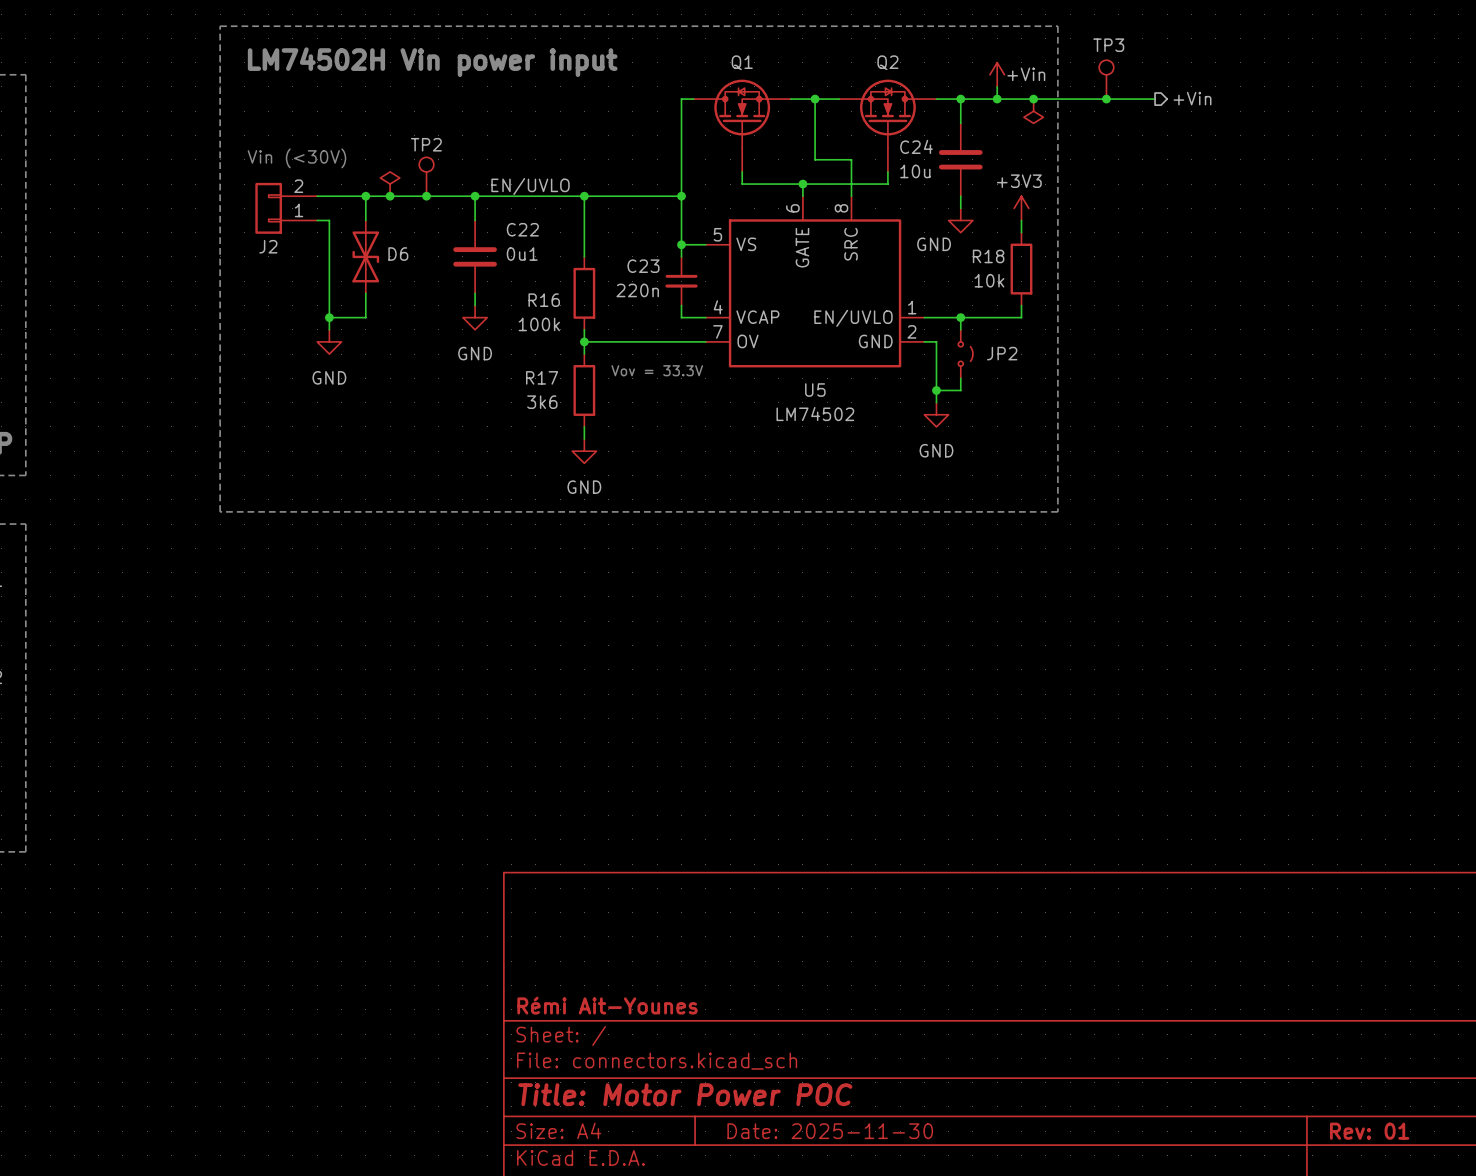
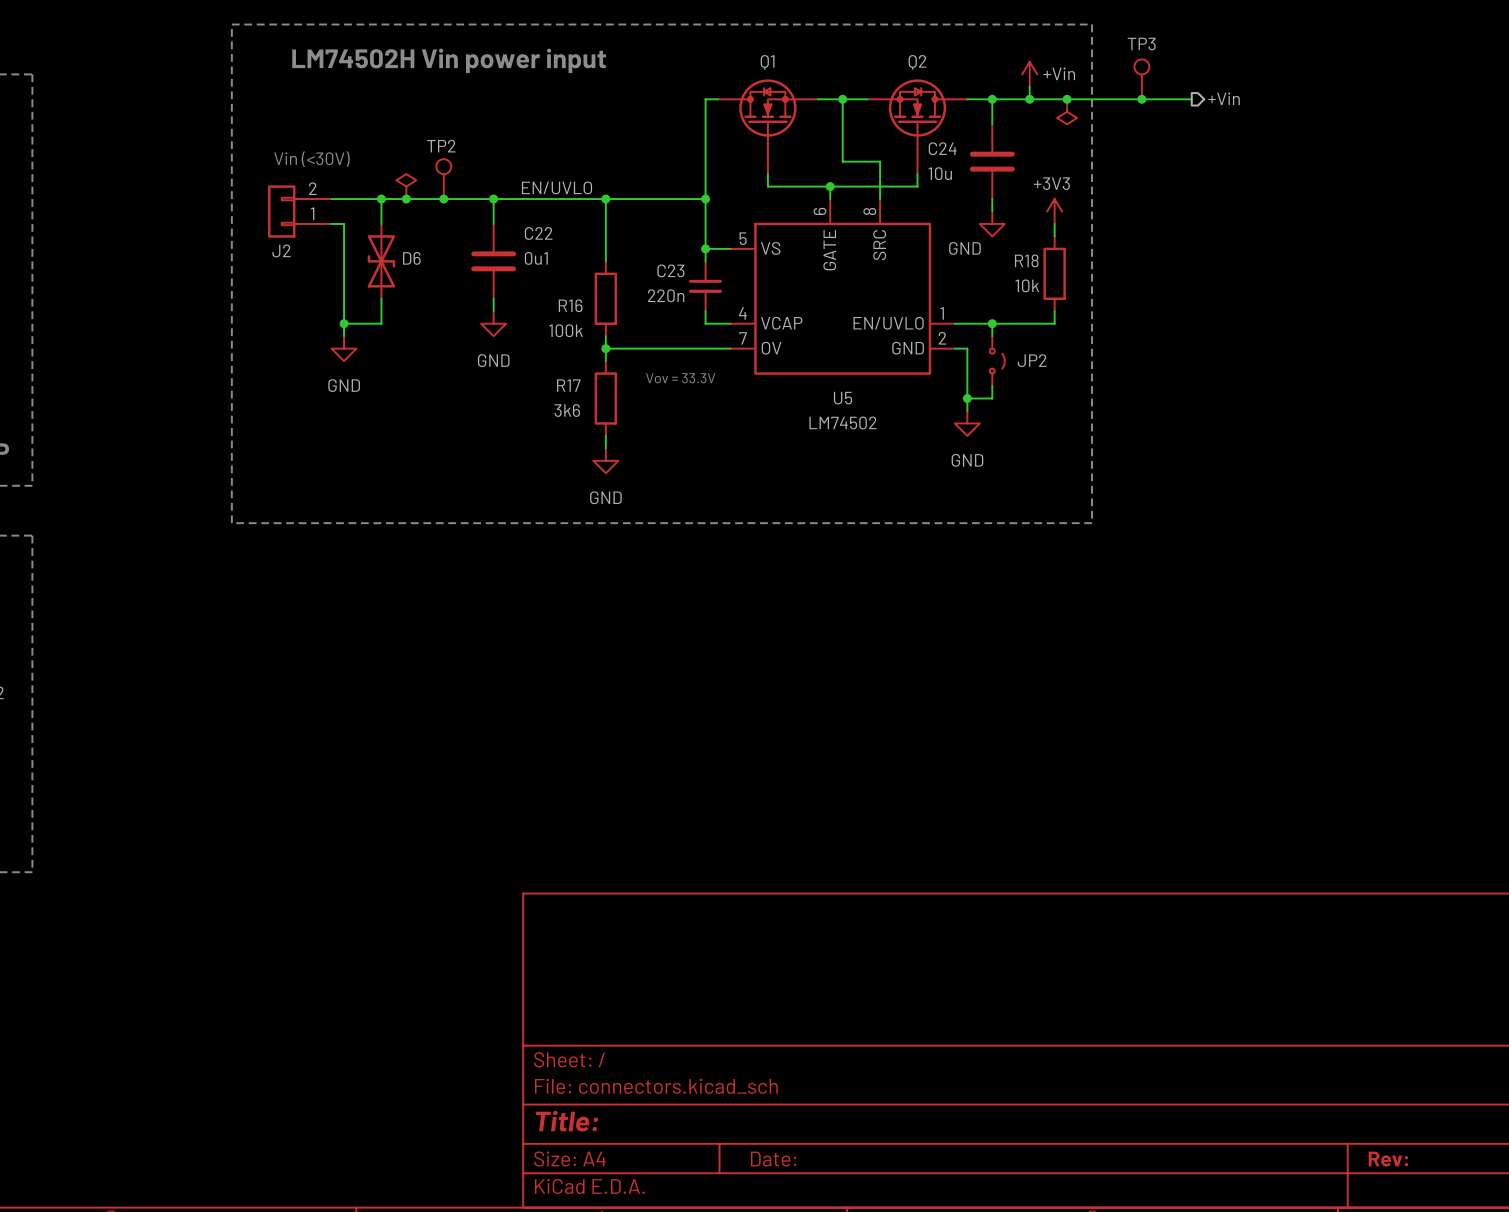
title block: Rémi Ait-Younes (607, 1005) -> none
title block: Title: Motor Power POC (685, 1094) -> Title: (567, 1121)
title block: Date: 2025-11-30 (830, 1131) -> Date: (773, 1159)
title block: Rev: 01 (1369, 1131) -> Rev: (1388, 1159)

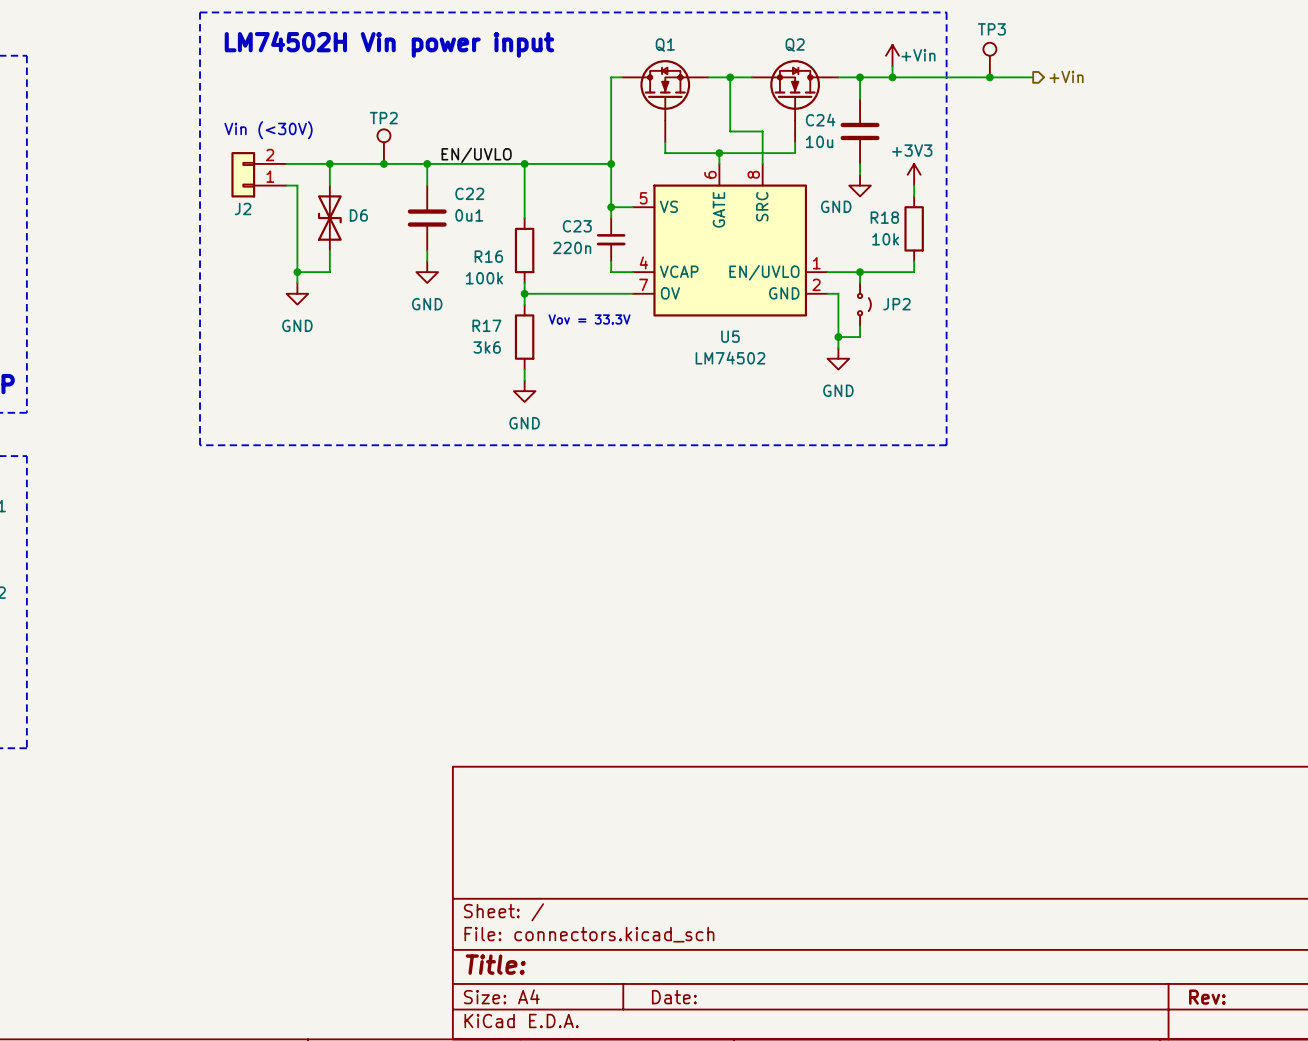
junction: (1067, 99) -> none
power symbol: (1067, 111) -> none
power symbol: (406, 186) -> none
junction: (406, 199) -> none

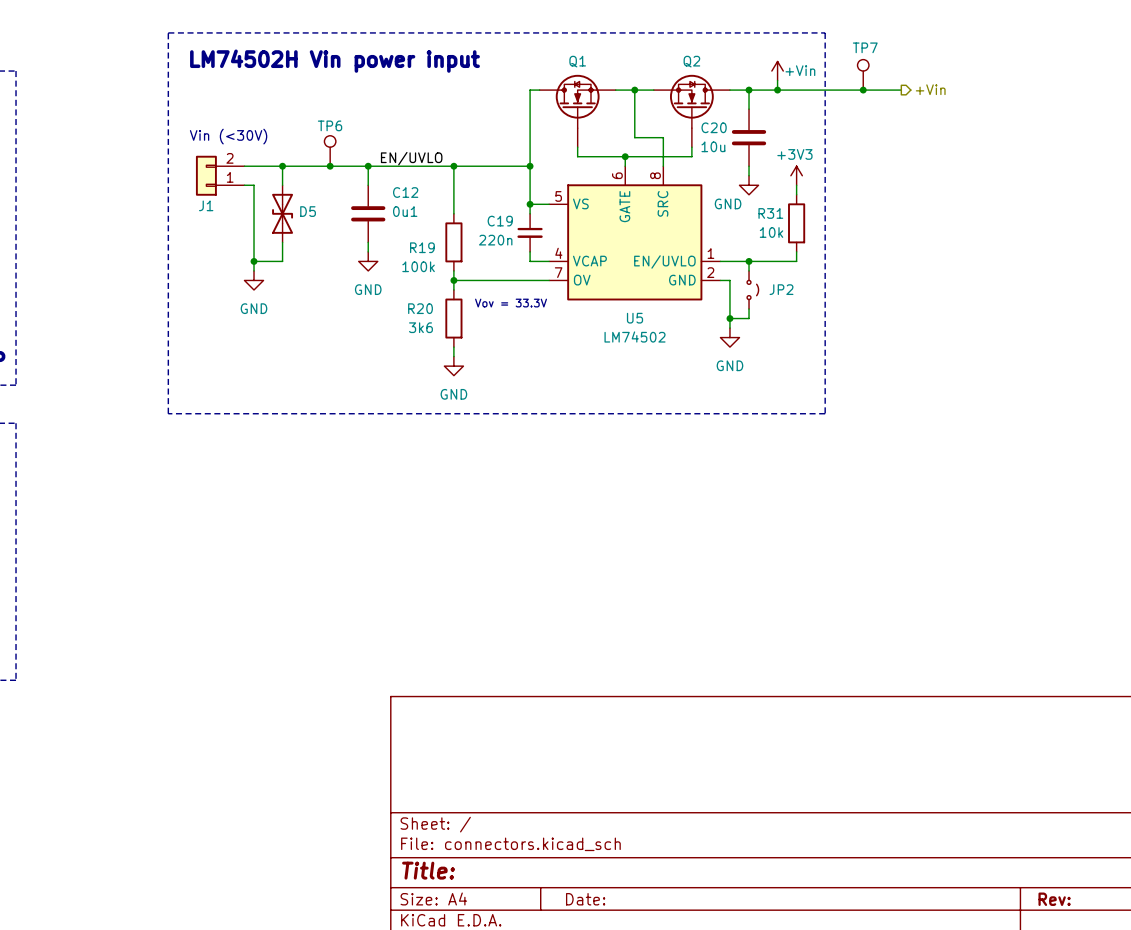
TP3 name: TP3 (991, 29) -> TP7 (865, 47)
TP2 name: TP2 (383, 118) -> TP6 (330, 125)
C24 name: C24 (820, 120) -> C20 (714, 127)
C22 name: C22 (469, 193) -> C12 (405, 192)
J2 name: J2 (243, 208) -> J1 (206, 205)
D6 name: D6 (358, 215) -> D5 (308, 211)
R18 name: R18 (884, 217) -> R31 (770, 213)
C23 name: C23 (577, 226) -> C19 (500, 221)
R16 name: R16 (488, 256) -> R19 (422, 247)
R17 name: R17 (486, 325) -> R20 (420, 308)

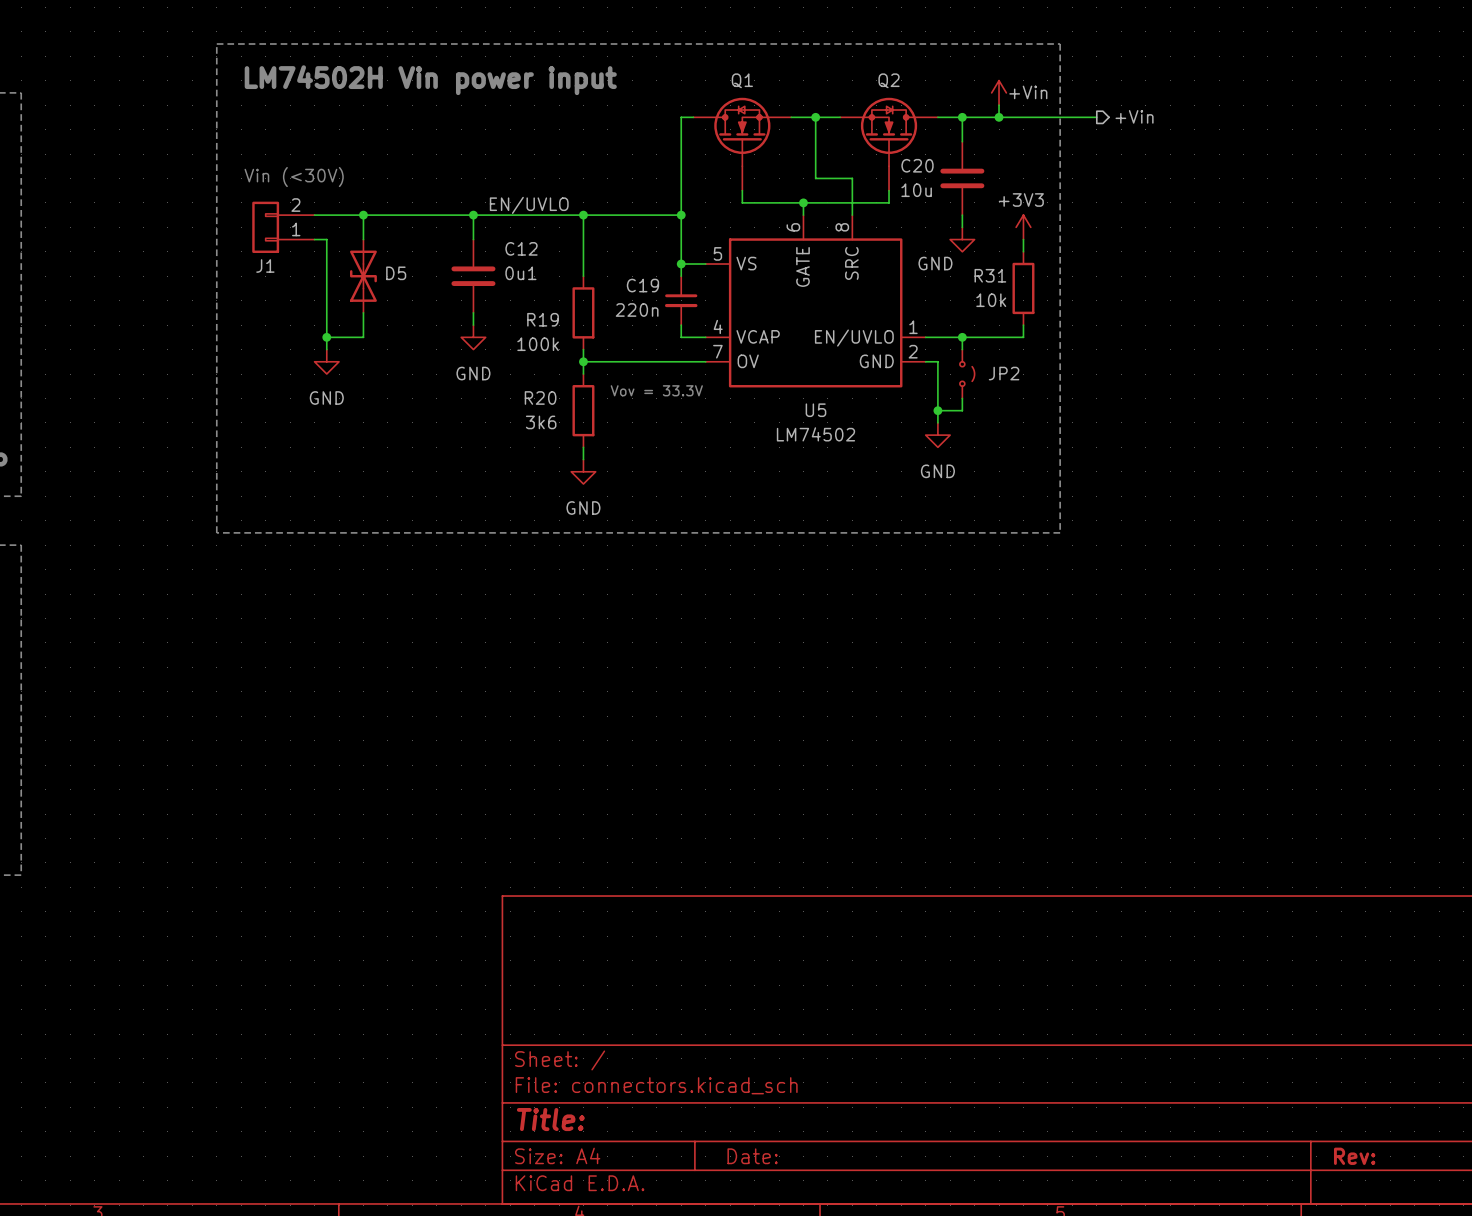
TP7: (863, 74) -> none
hierarchical label position: +Vin (930, 89) -> +Vin (1134, 116)
wire: (853, 90) (901, 90) -> none
junction: (863, 90) -> none
TP6: (330, 150) -> none
junction: (330, 166) -> none

